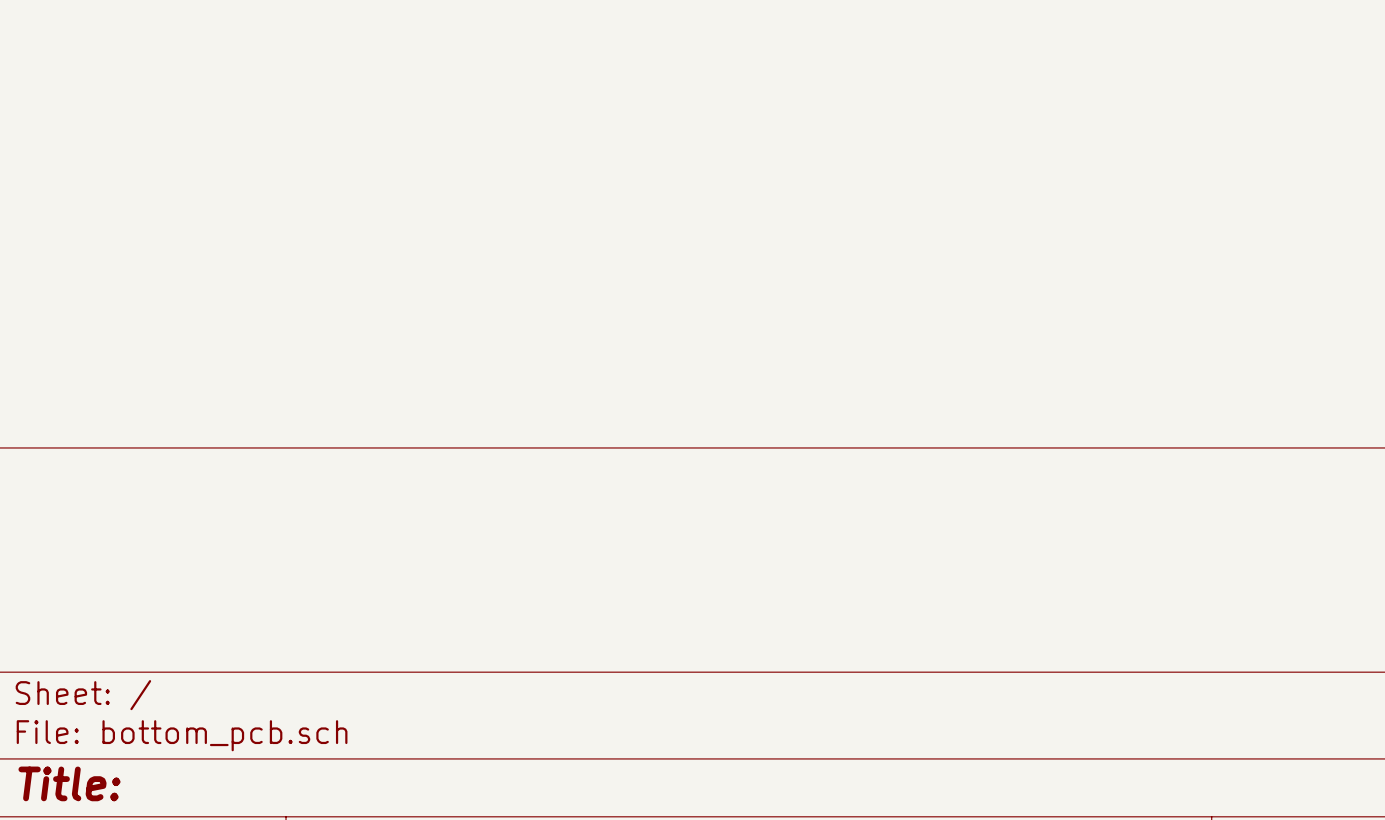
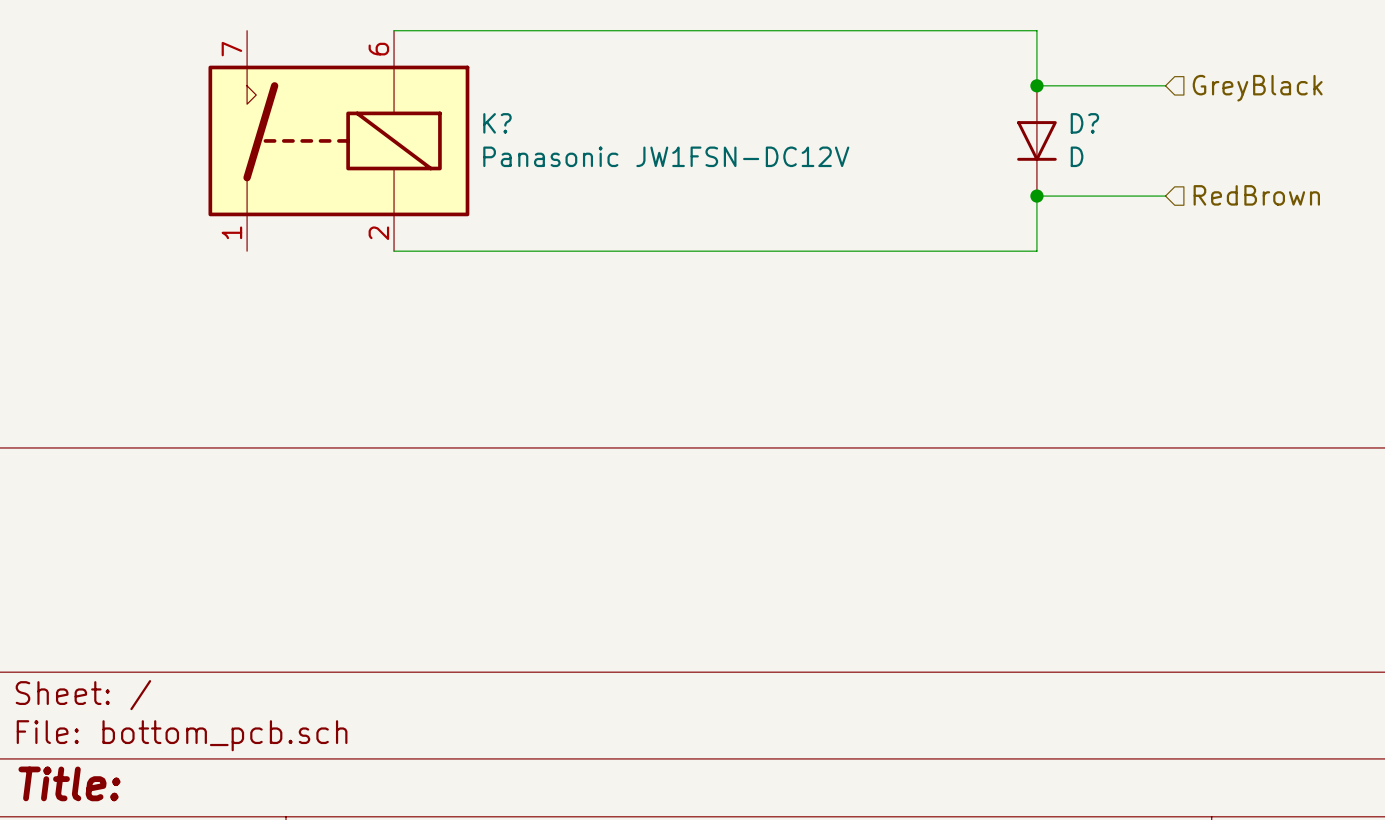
wire: none -> (394, 30) (1036, 30) (1036, 85) (1165, 85)
junction: none -> (1036, 85)
hierarchical label: none -> GreyBlack (1257, 88)
K?: none -> Panasonic JW1FSN-DC12V (338, 140)
D?: none -> D (1036, 140)
hierarchical label: none -> RedBrown (1256, 195)
junction: none -> (1036, 196)
wire: none -> (1165, 196) (1036, 196) (1036, 251) (394, 251)

